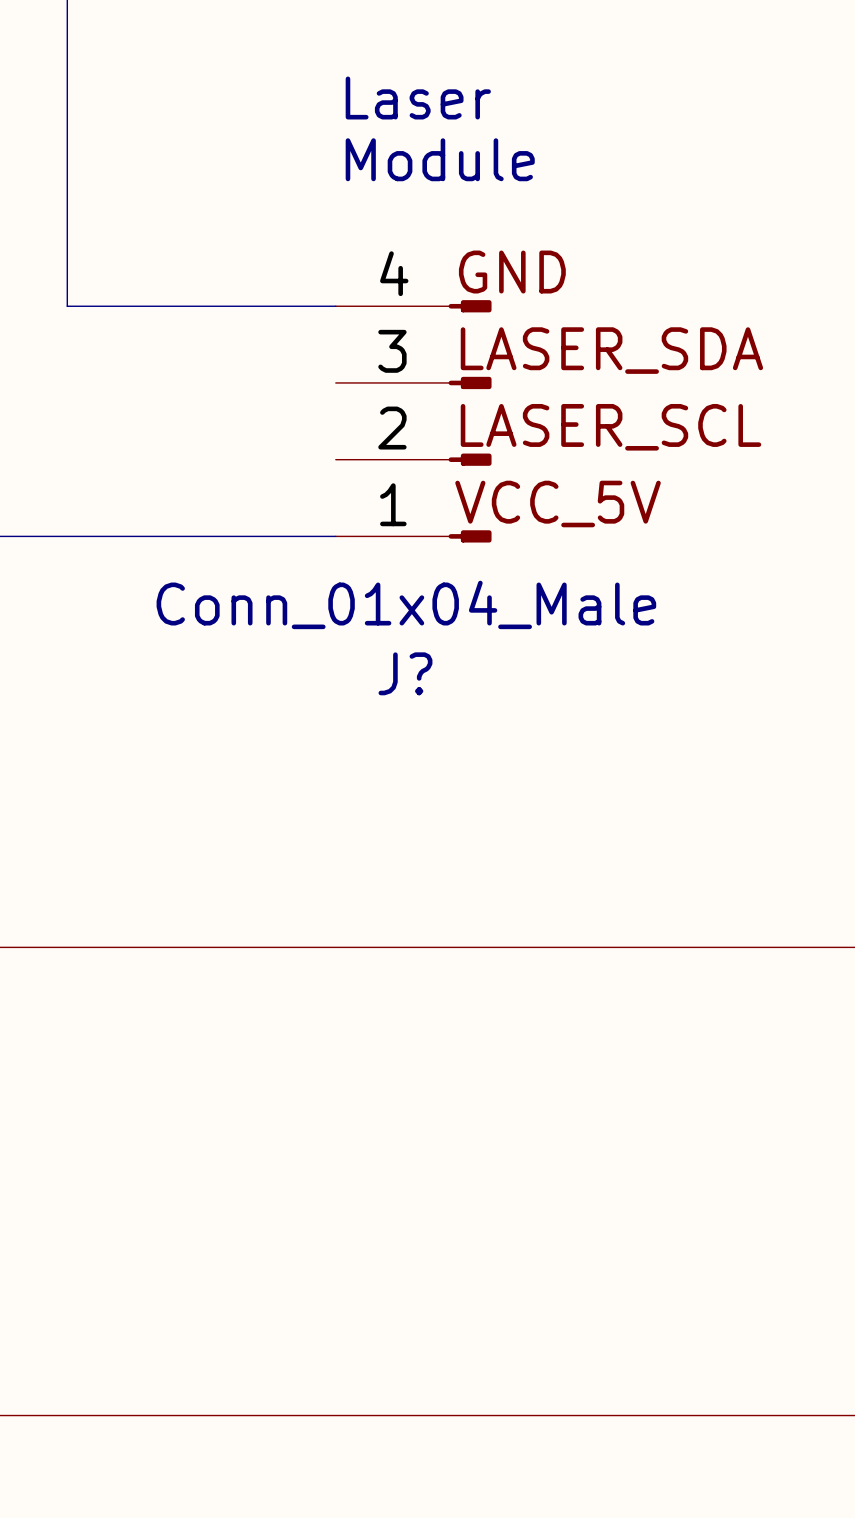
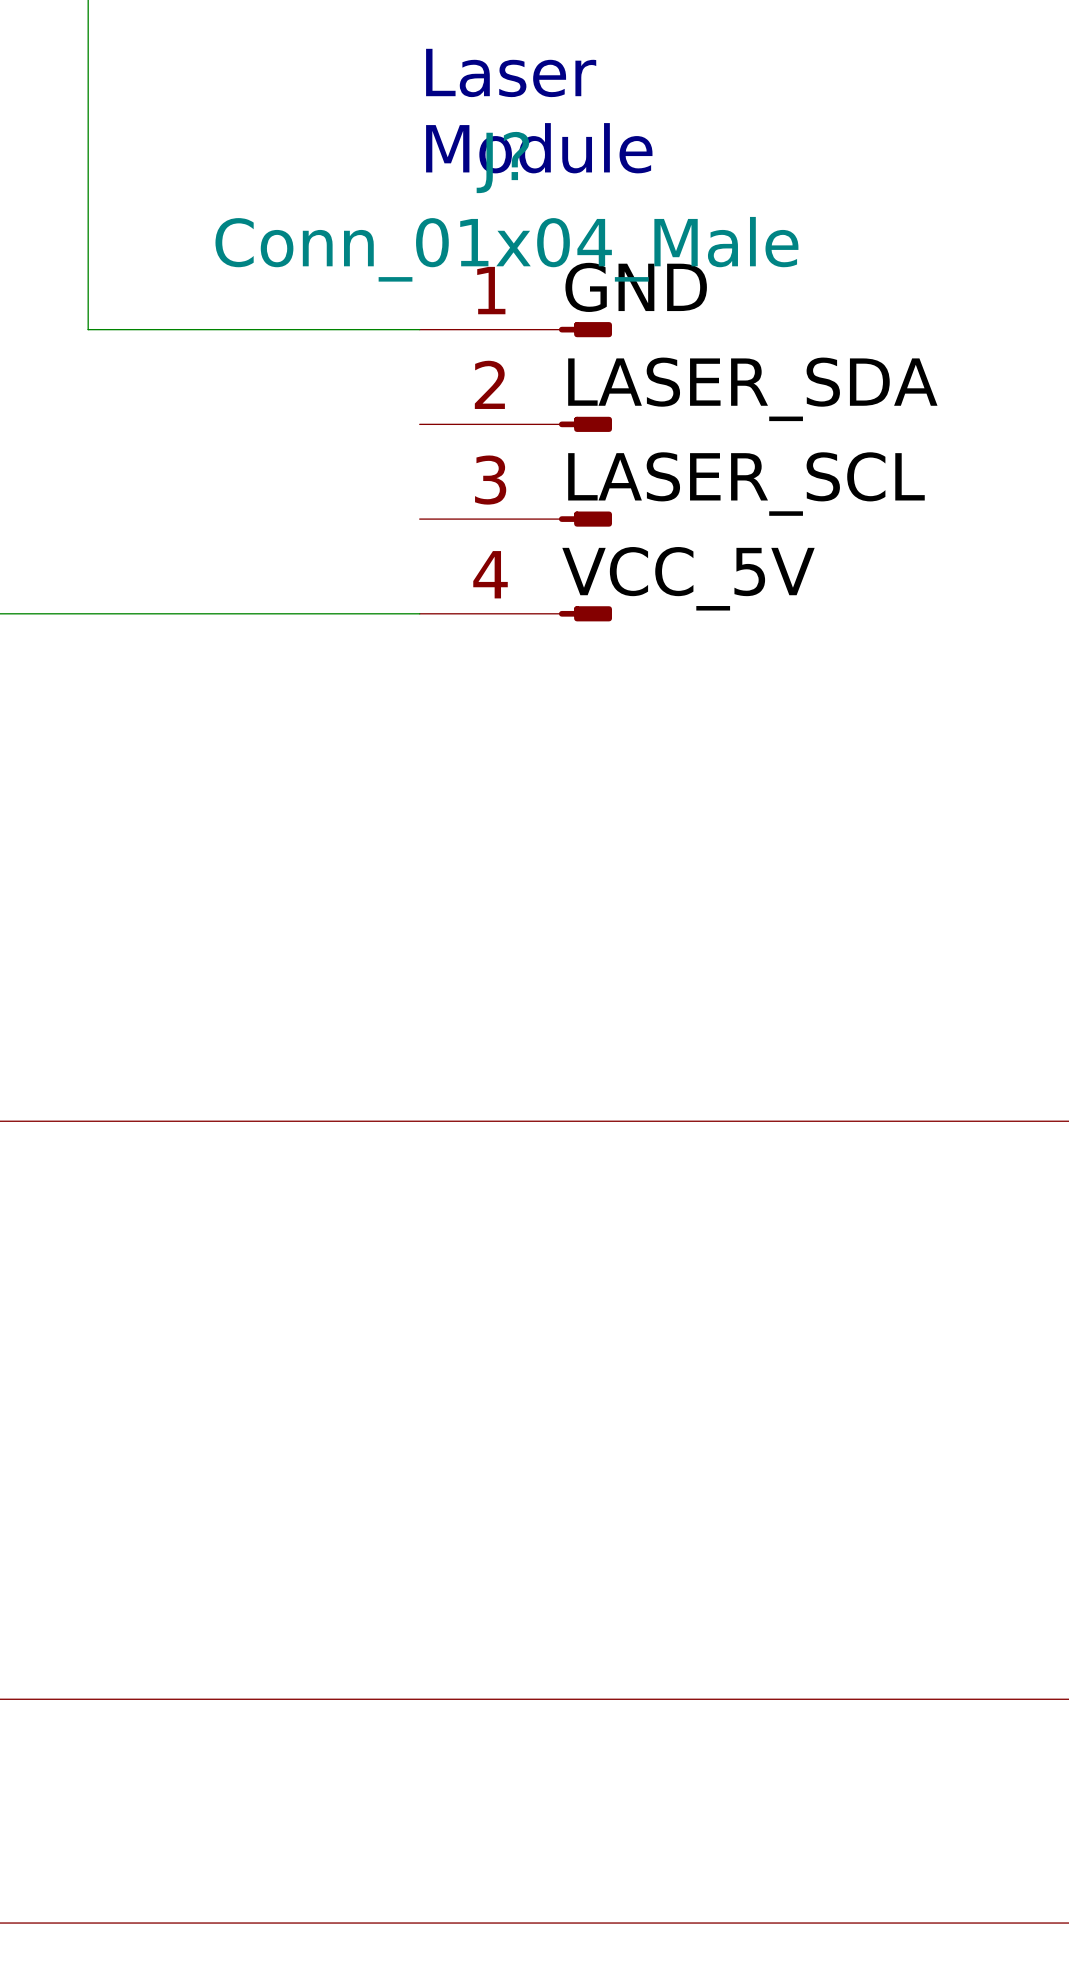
J? flip: as is (470, 421) -> up-down (585, 471)

